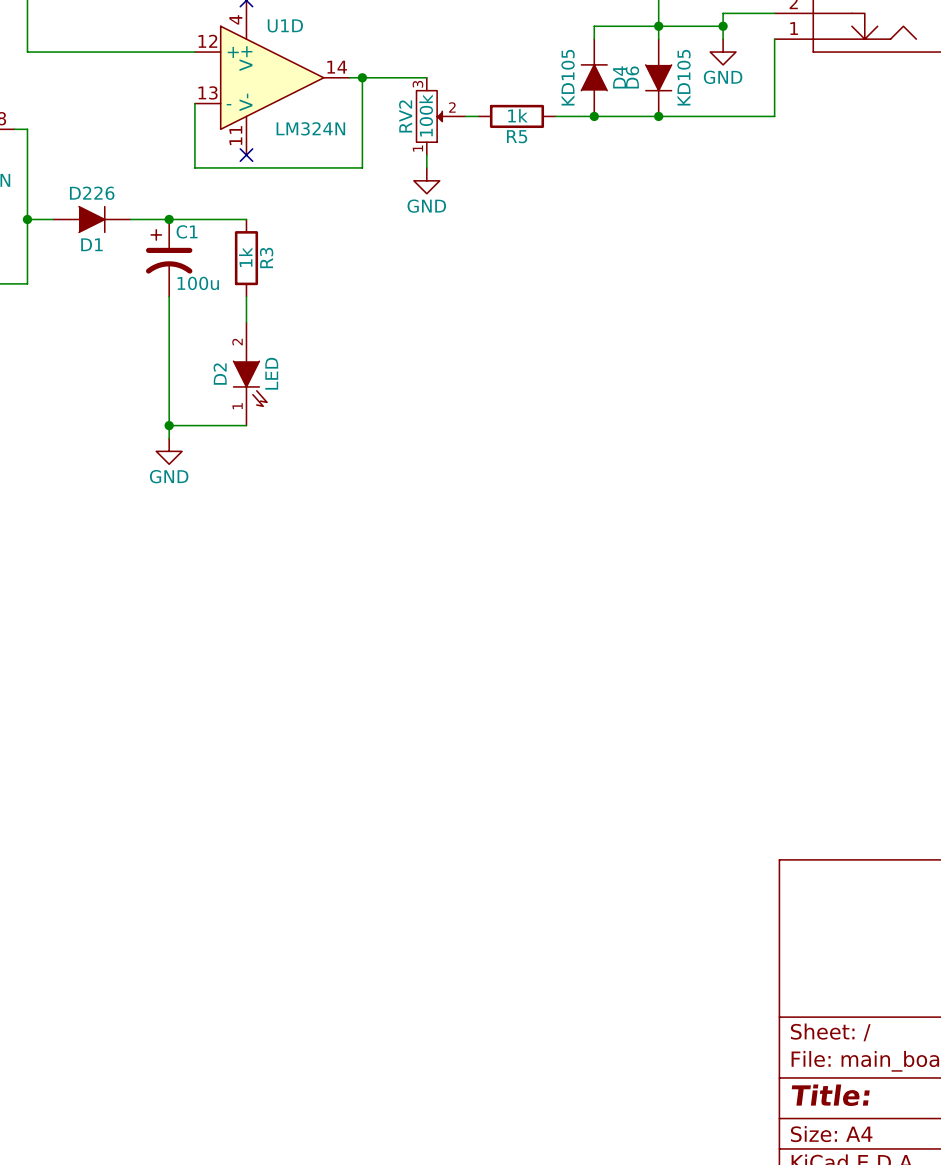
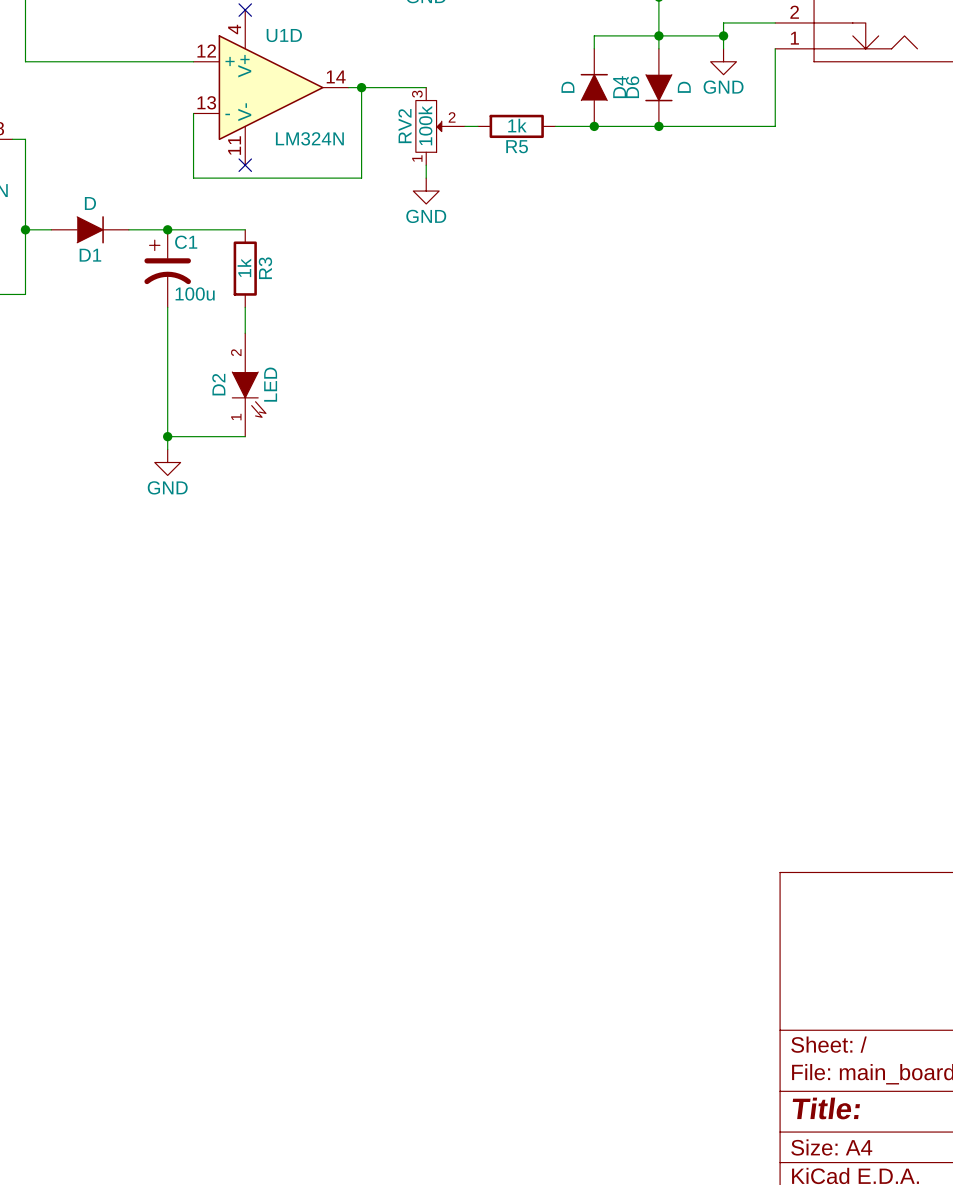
D4 value: KD105 (568, 77) -> D (567, 87)
D6 value: KD105 (683, 77) -> D (684, 87)
D1 value: D226 (92, 193) -> D (90, 203)

